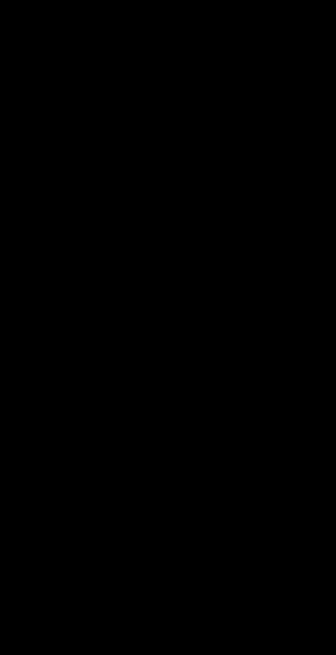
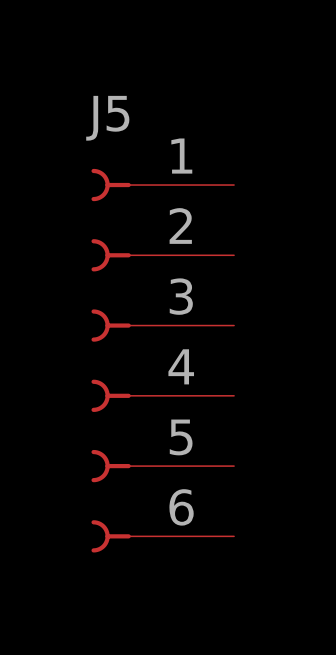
J5: none -> (162, 360)

